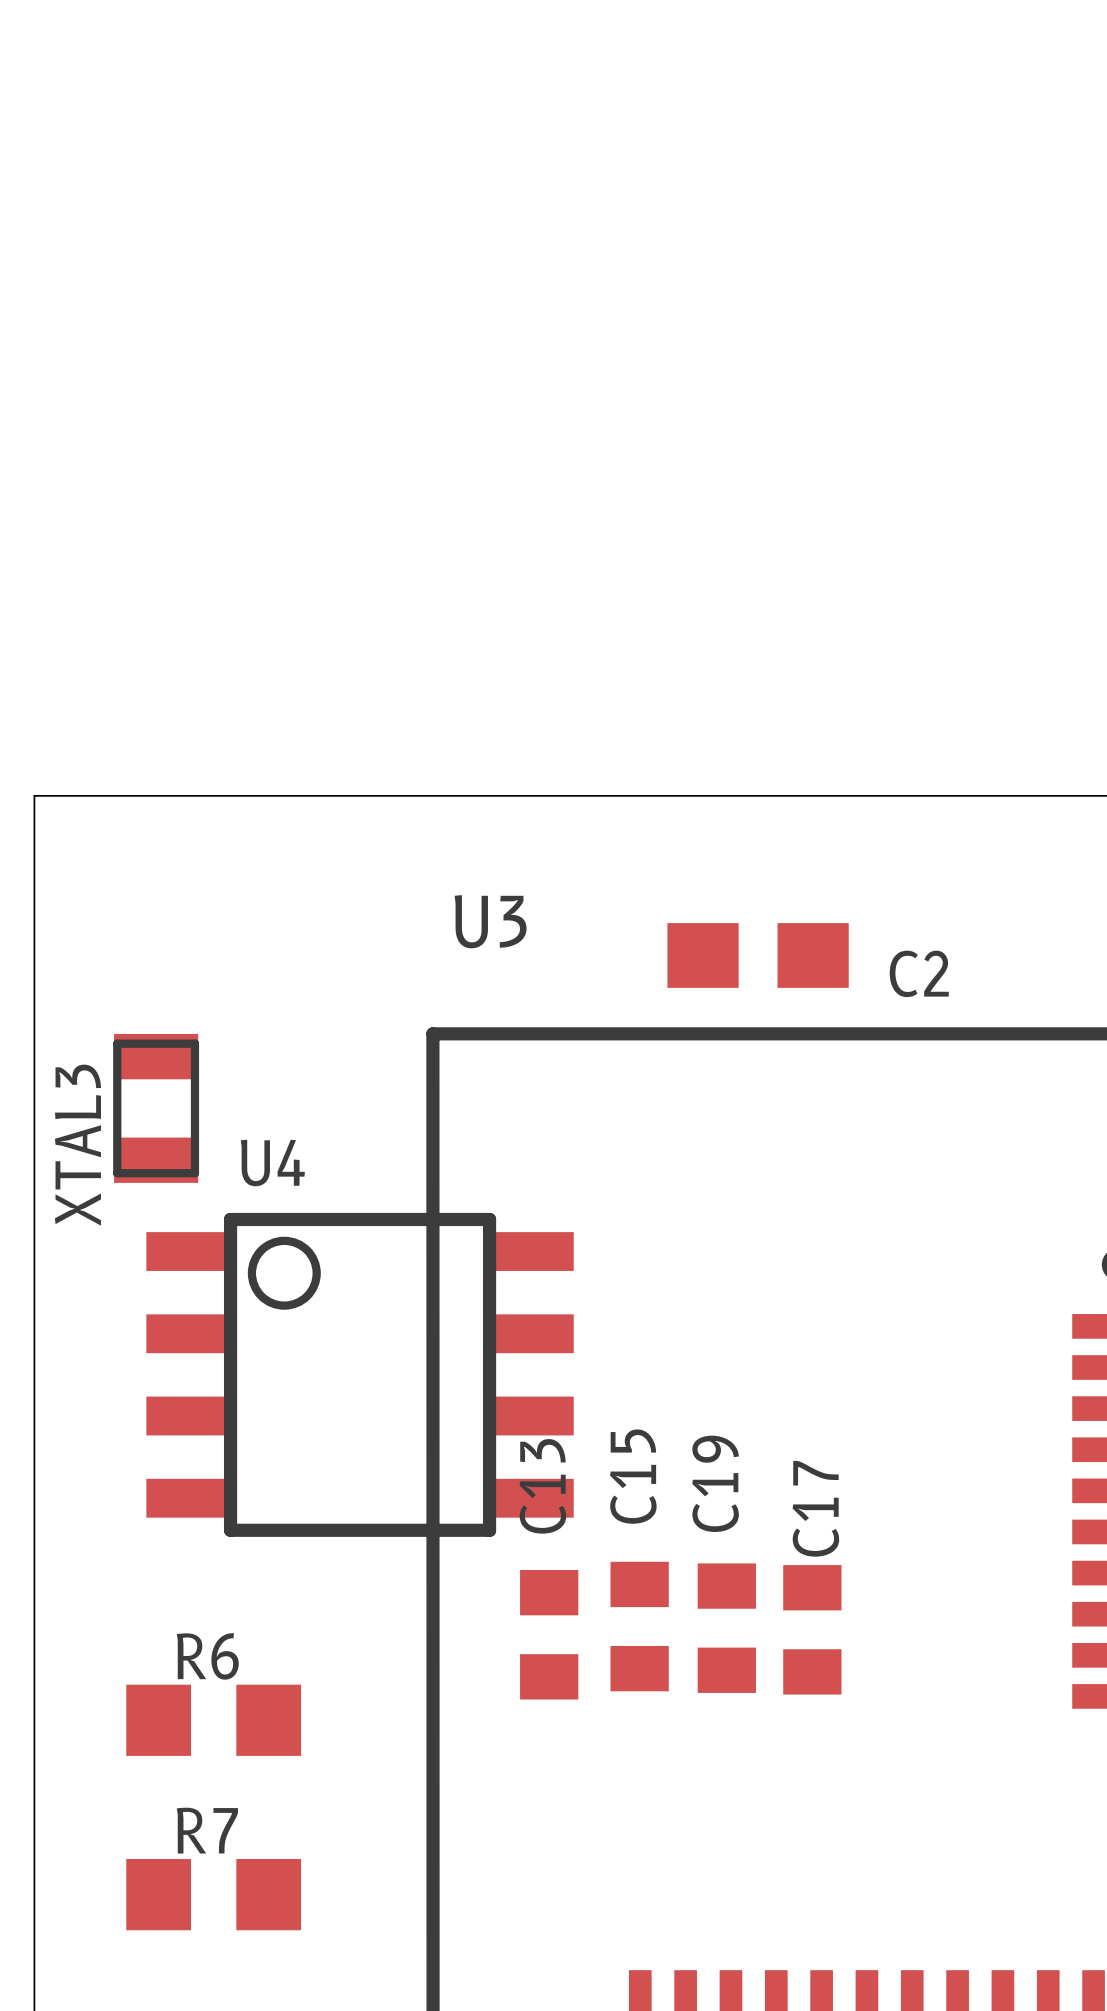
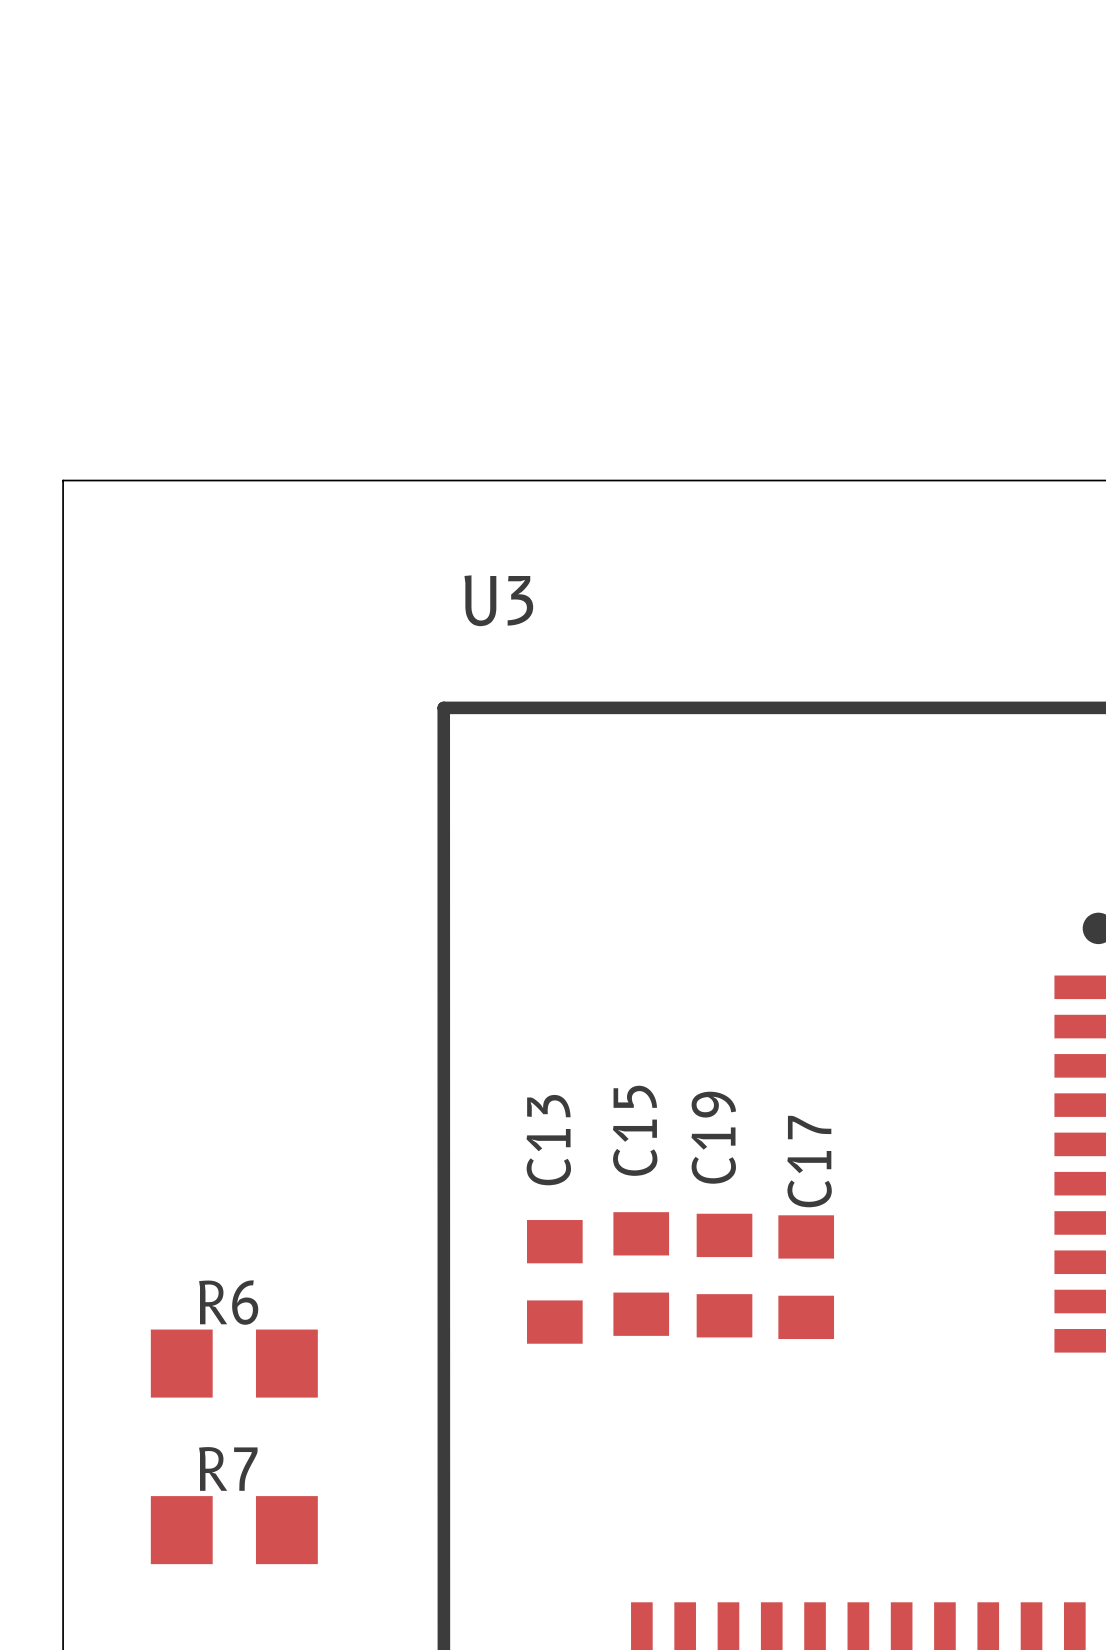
C2: (758, 955) -> none
XTAL3: (156, 1108) -> none
U4: (360, 1374) -> none

